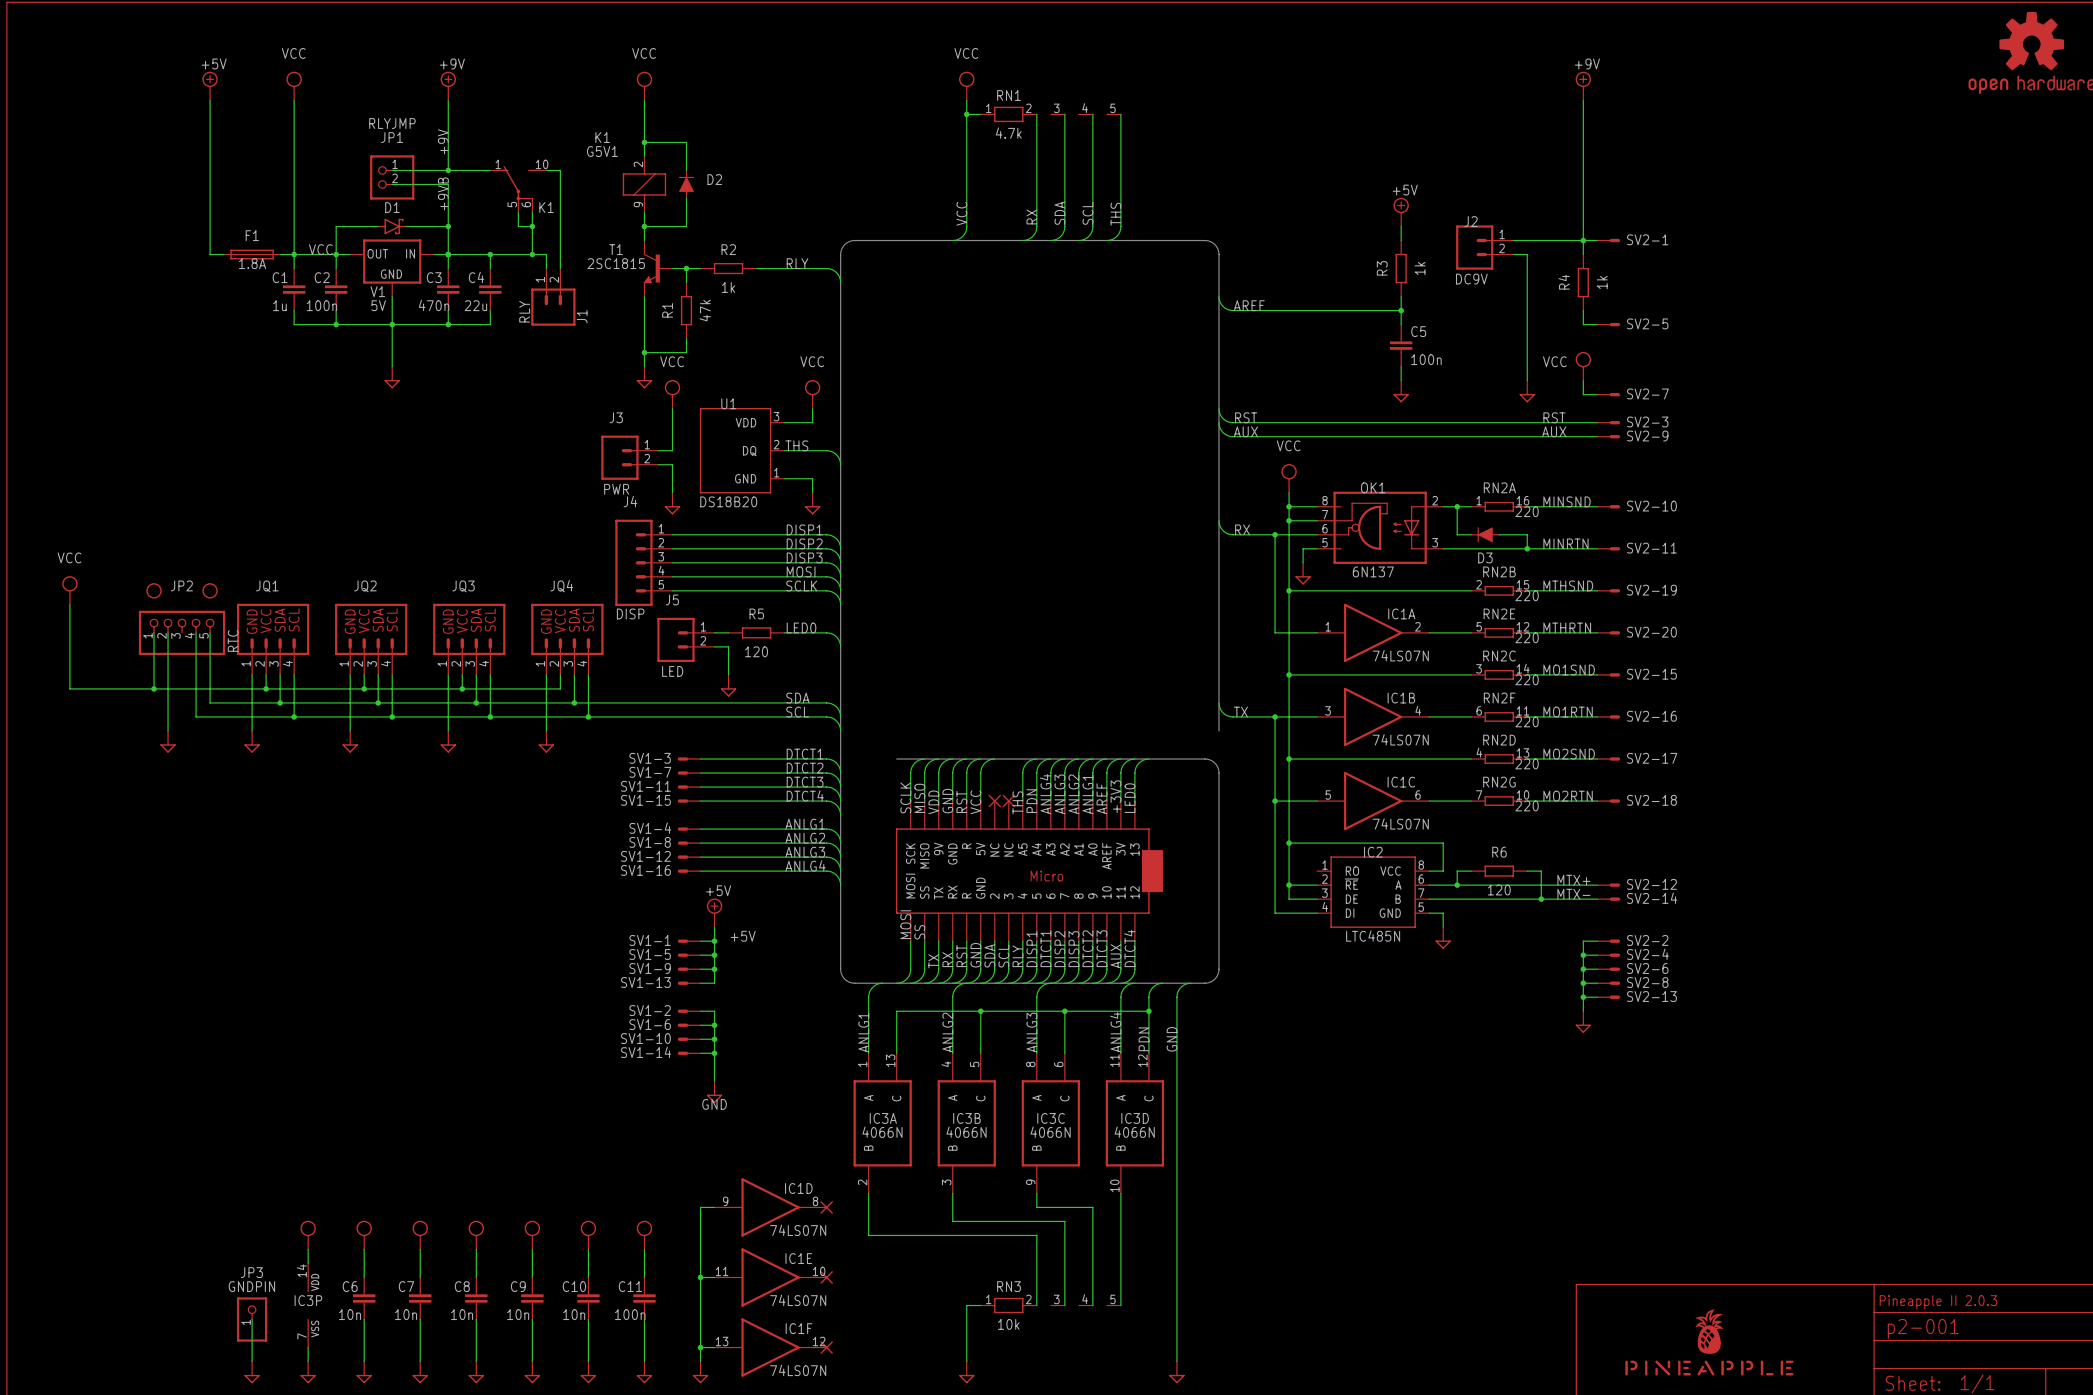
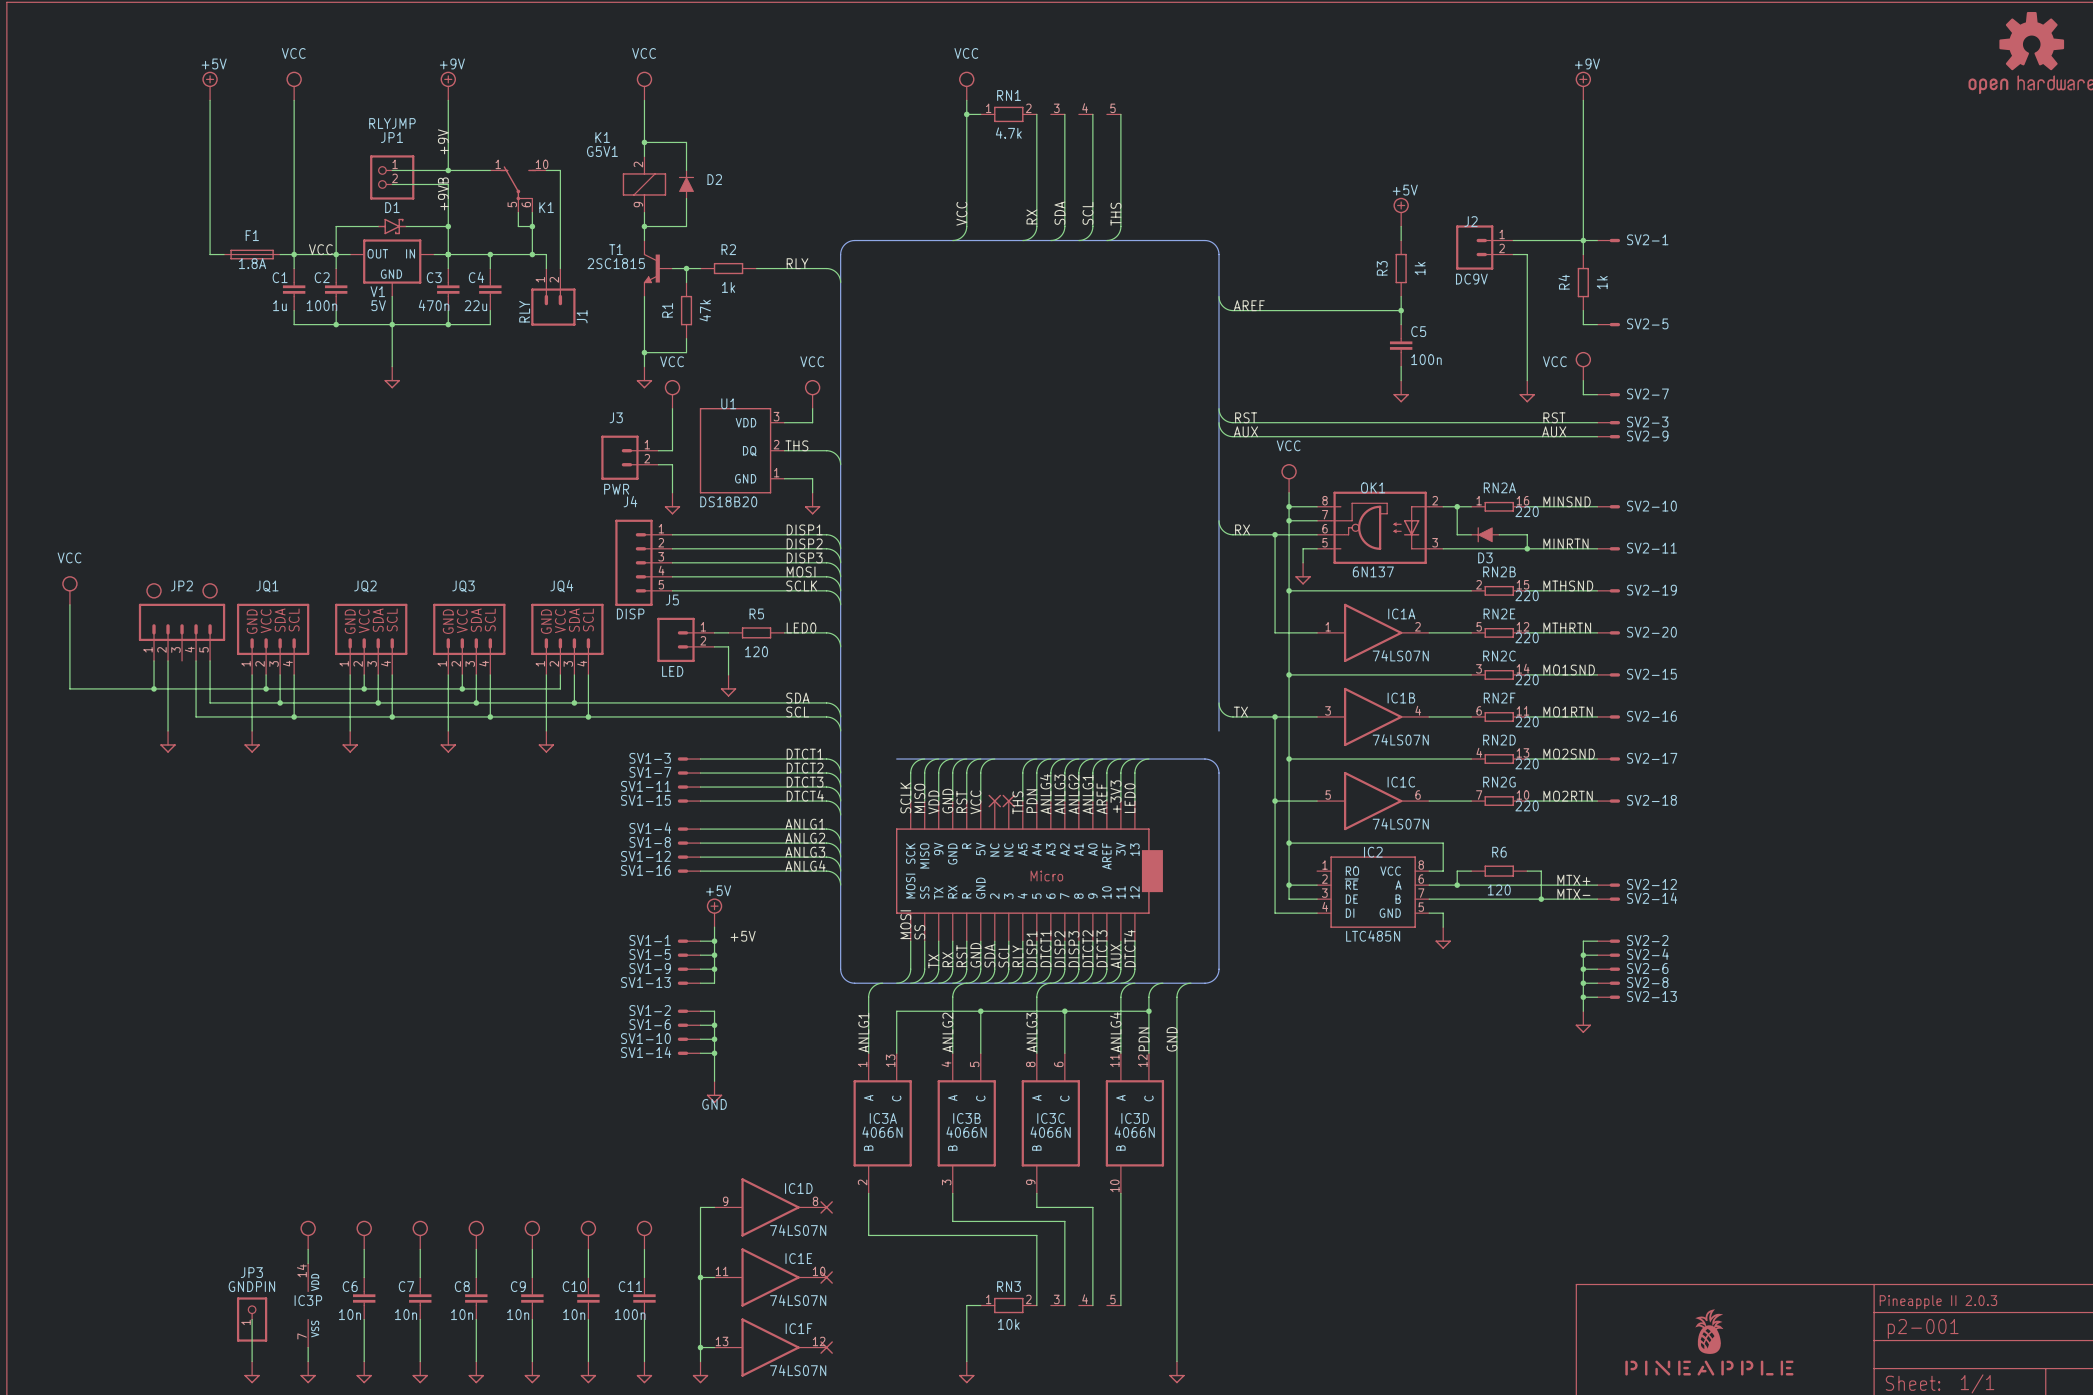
JP2 symbol: [138, 610, 226, 656] -> [138, 603, 226, 661]
JP2 value: RTC (233, 640) -> none

